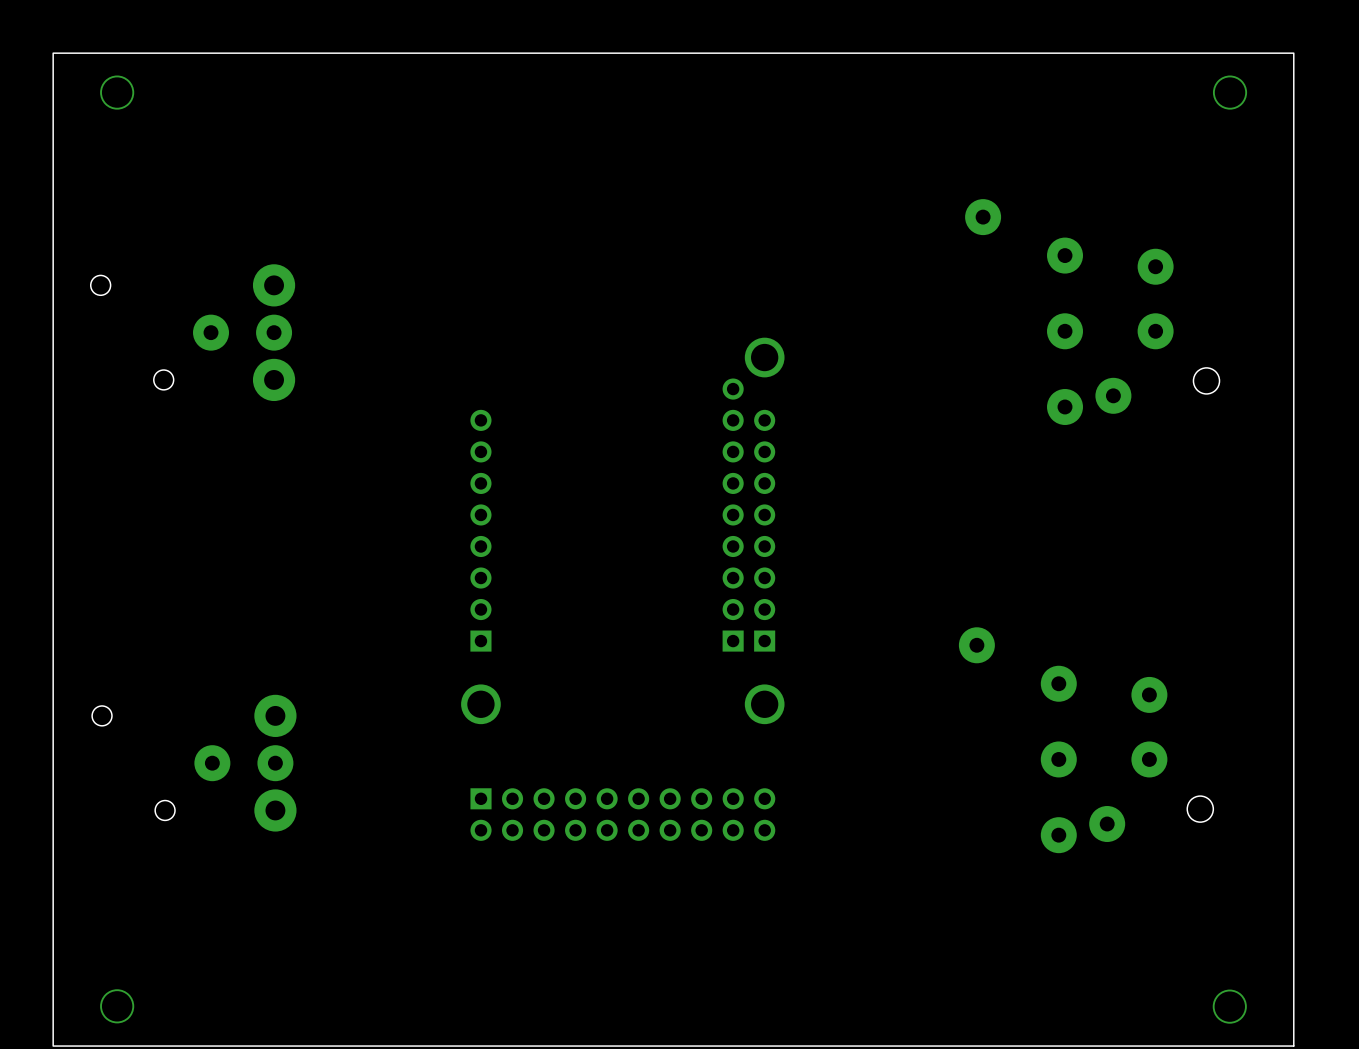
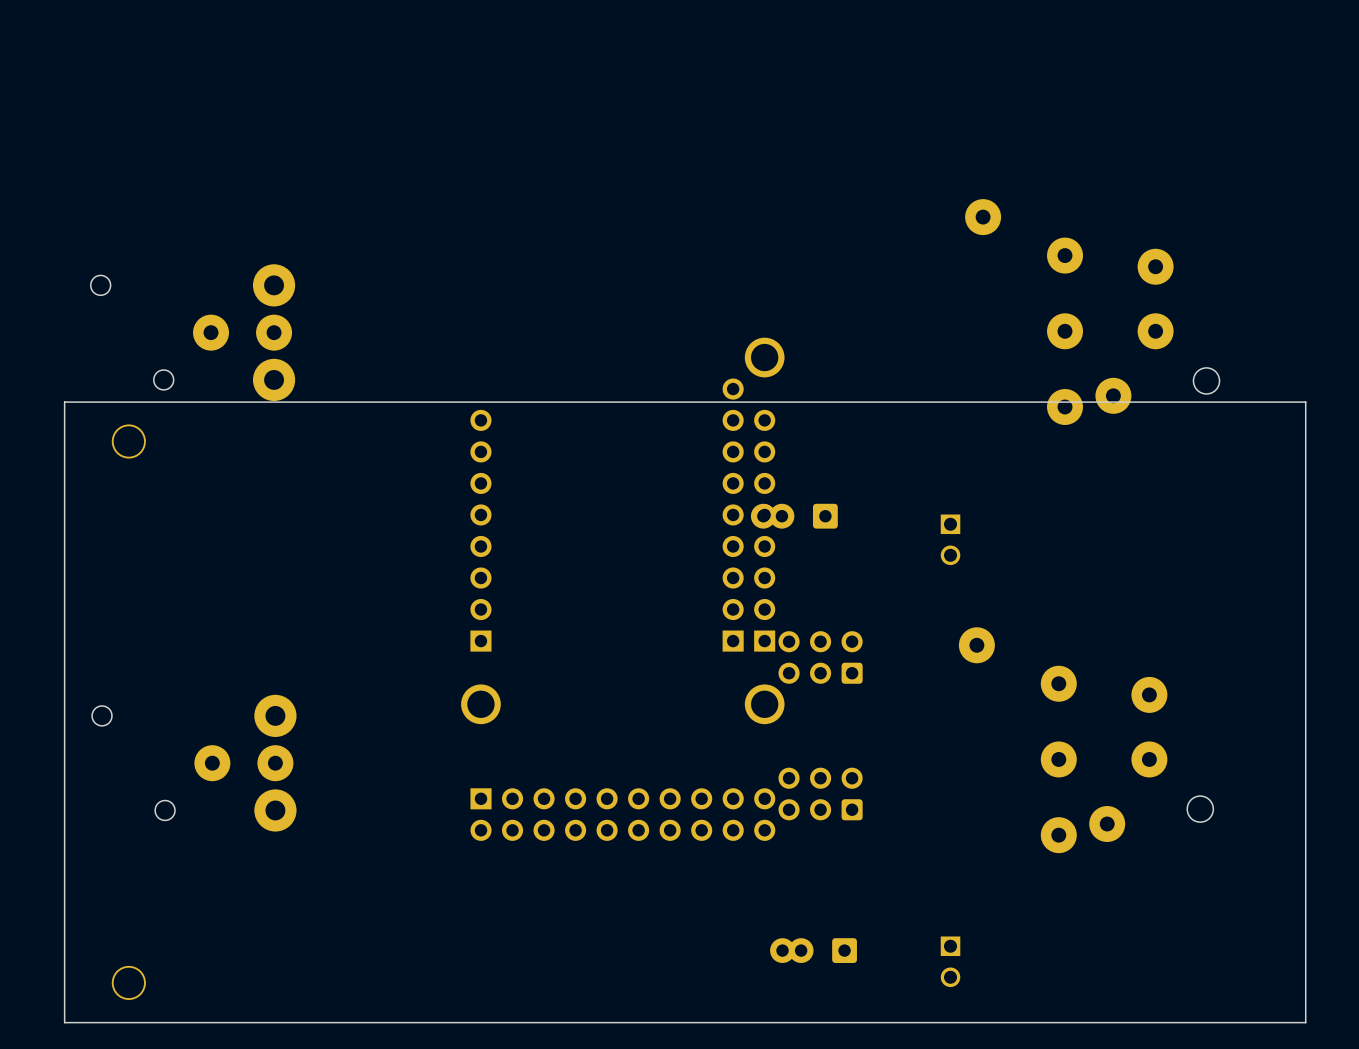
part: none -> (794, 516)
part: none -> (950, 539)
part: (673, 549) -> none
part: none -> (820, 657)
part: none -> (685, 712)
part: none -> (820, 793)
part: none -> (813, 950)
part: none -> (950, 961)

